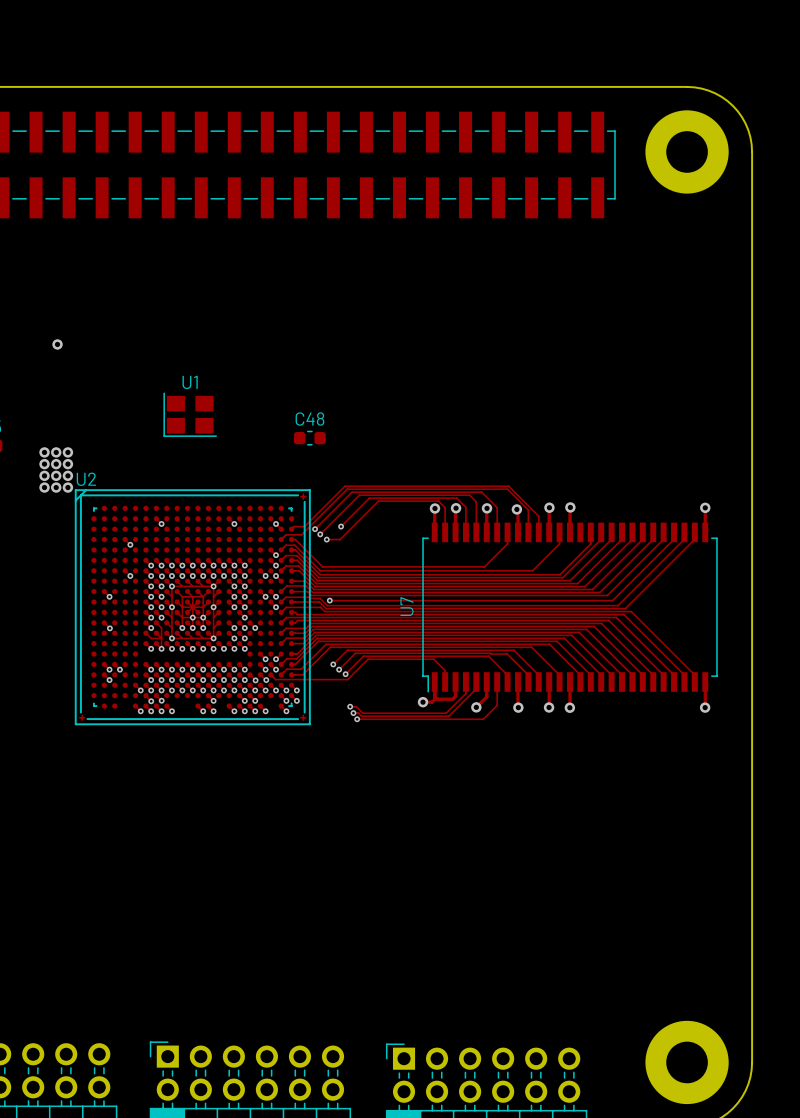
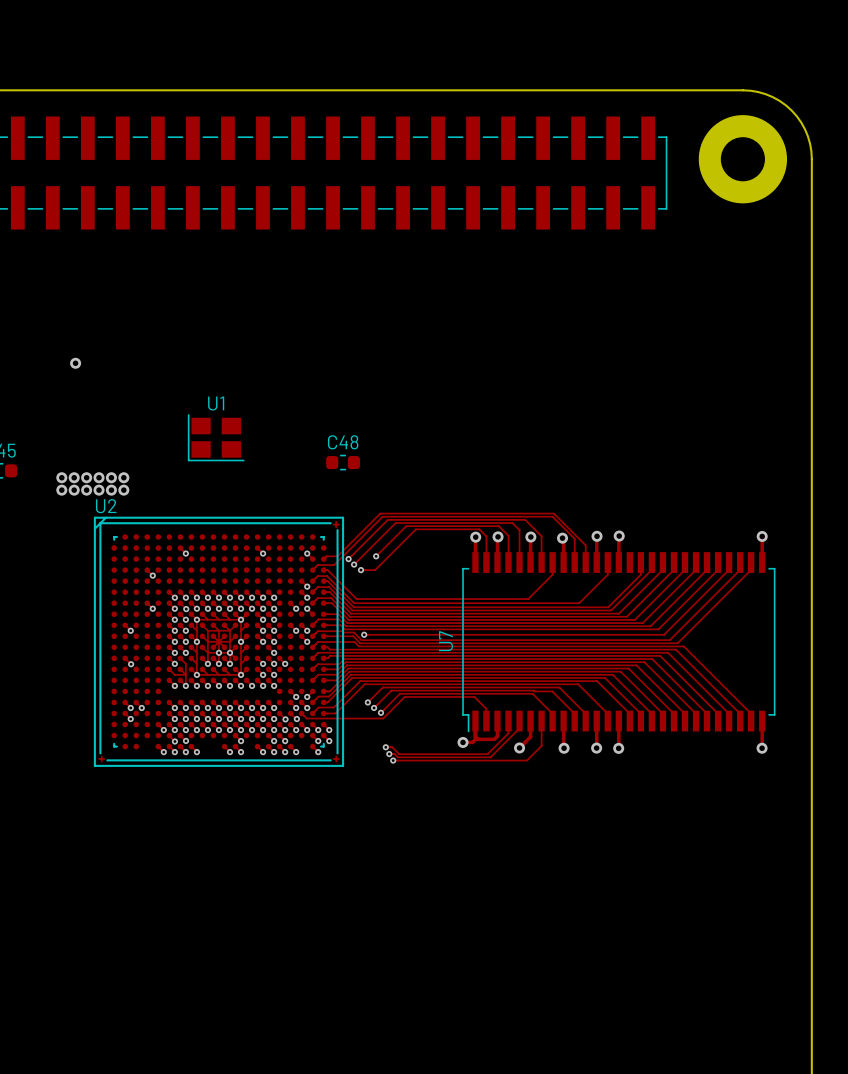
via: none -> (99, 477)
via: none -> (111, 477)
via: none -> (123, 477)
via: none -> (99, 490)
via: none -> (111, 490)
via: none -> (123, 490)
via: (44, 475) -> none
via: (56, 475) -> none
via: (67, 475) -> none
via: (44, 487) -> none
via: (56, 487) -> none
via: (67, 487) -> none

